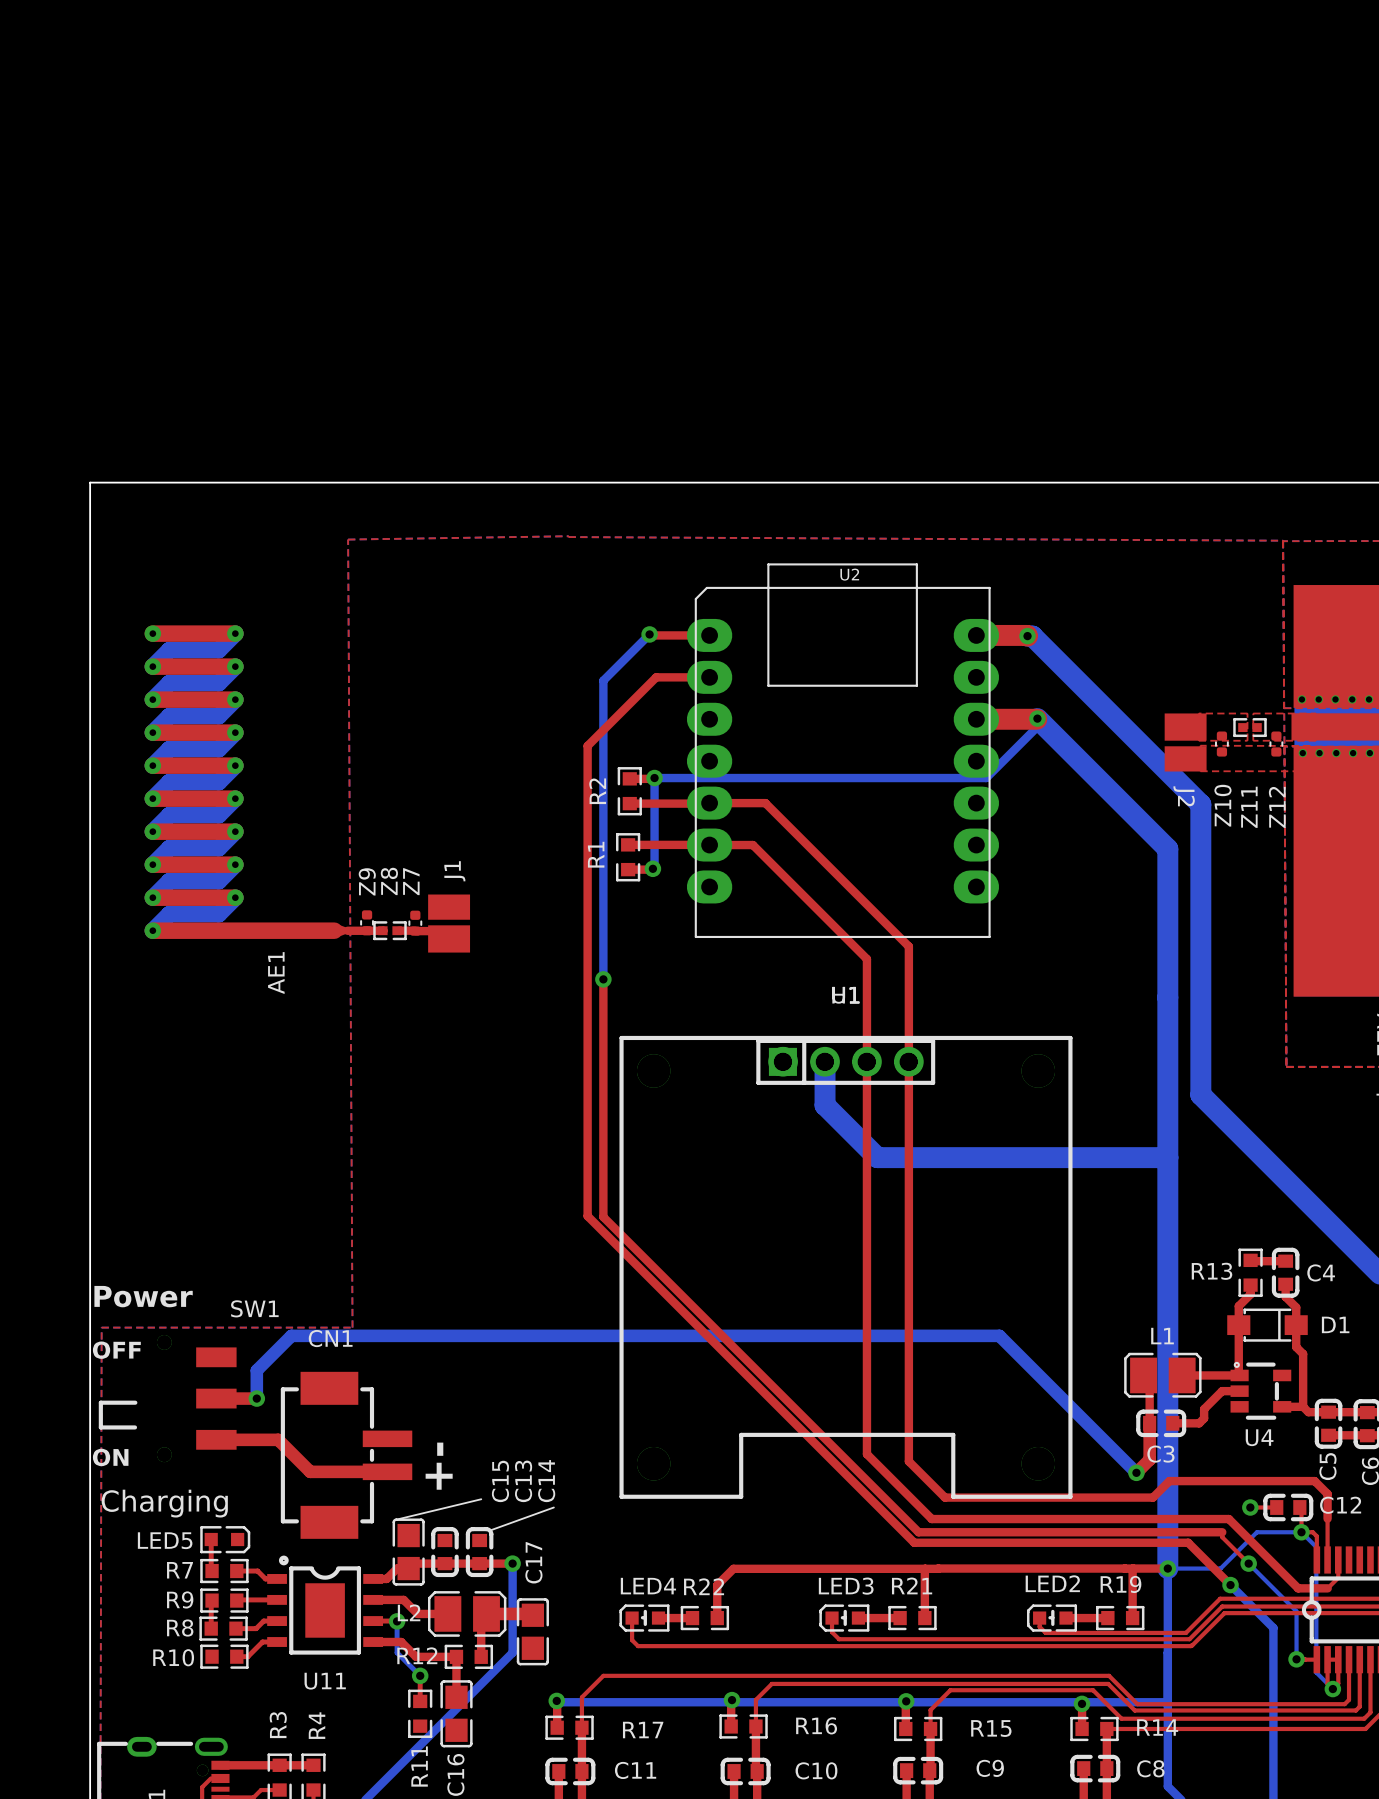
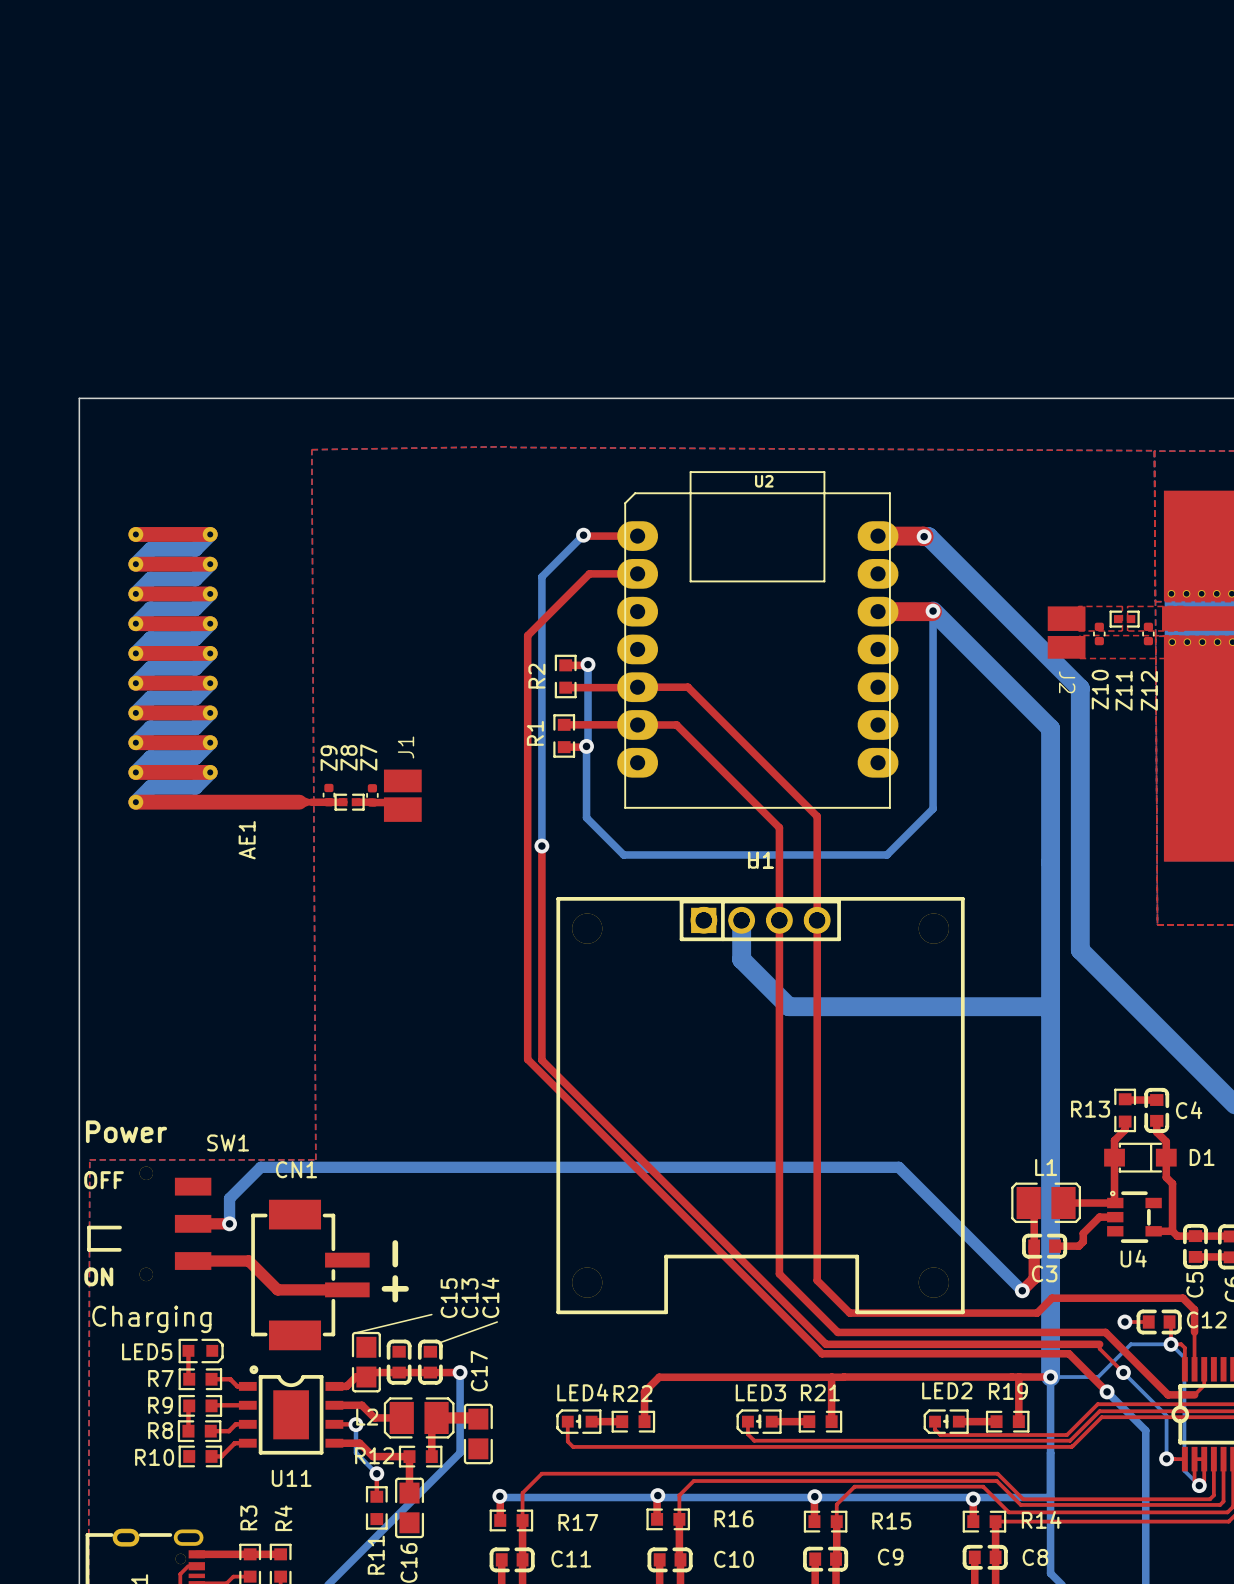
bottom track: (1037, 726) (986, 778) (654, 778) -> (933, 618) (933, 808) (886, 854) (623, 854) (586, 817) (586, 746)

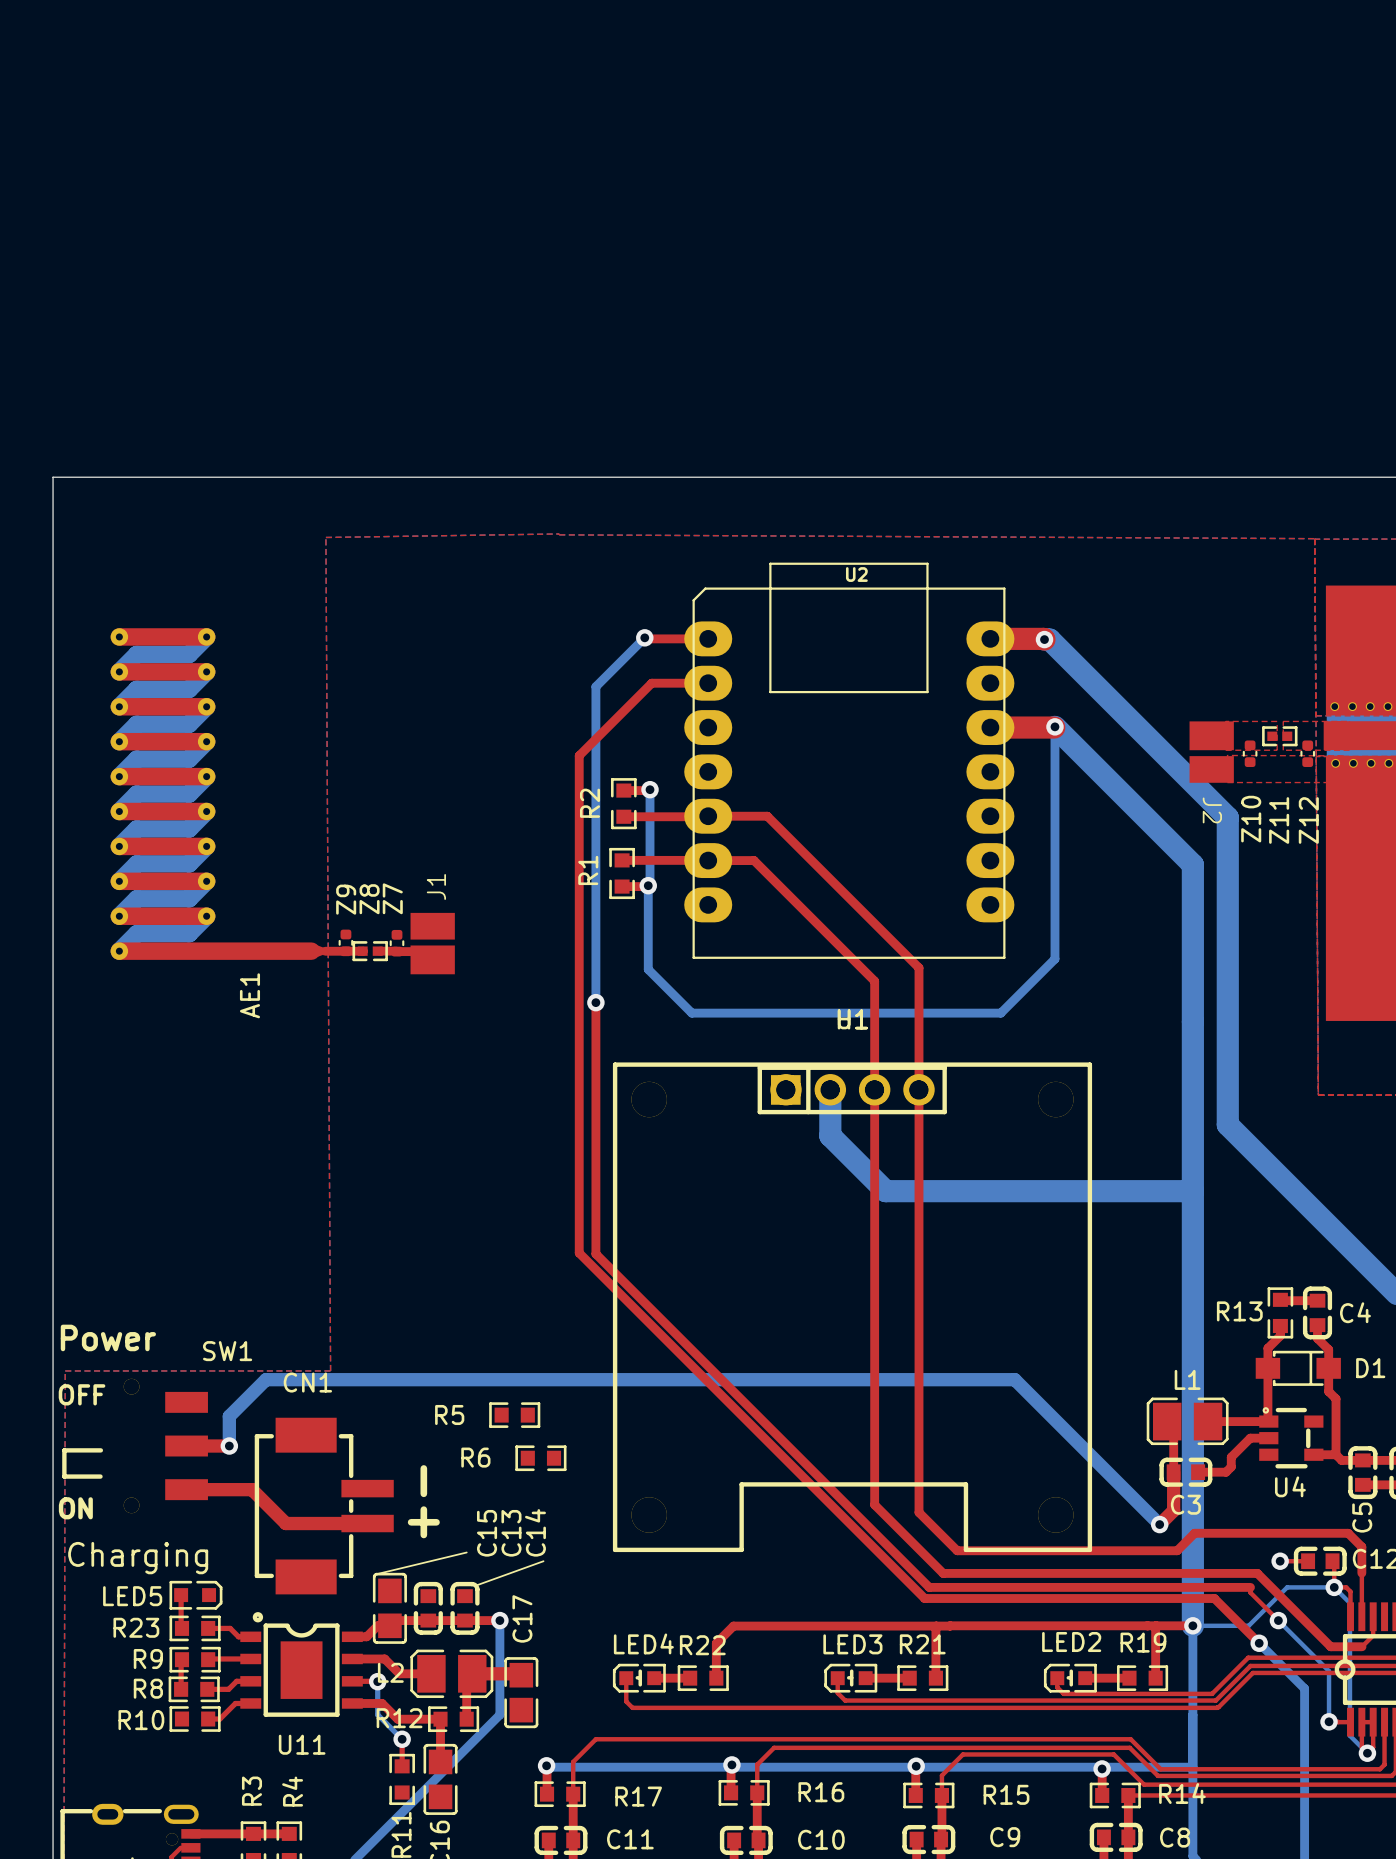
R5: none -> (514, 1415)
R6: none -> (540, 1458)
R7 name: R7 (160, 1378) -> R23 (136, 1627)

